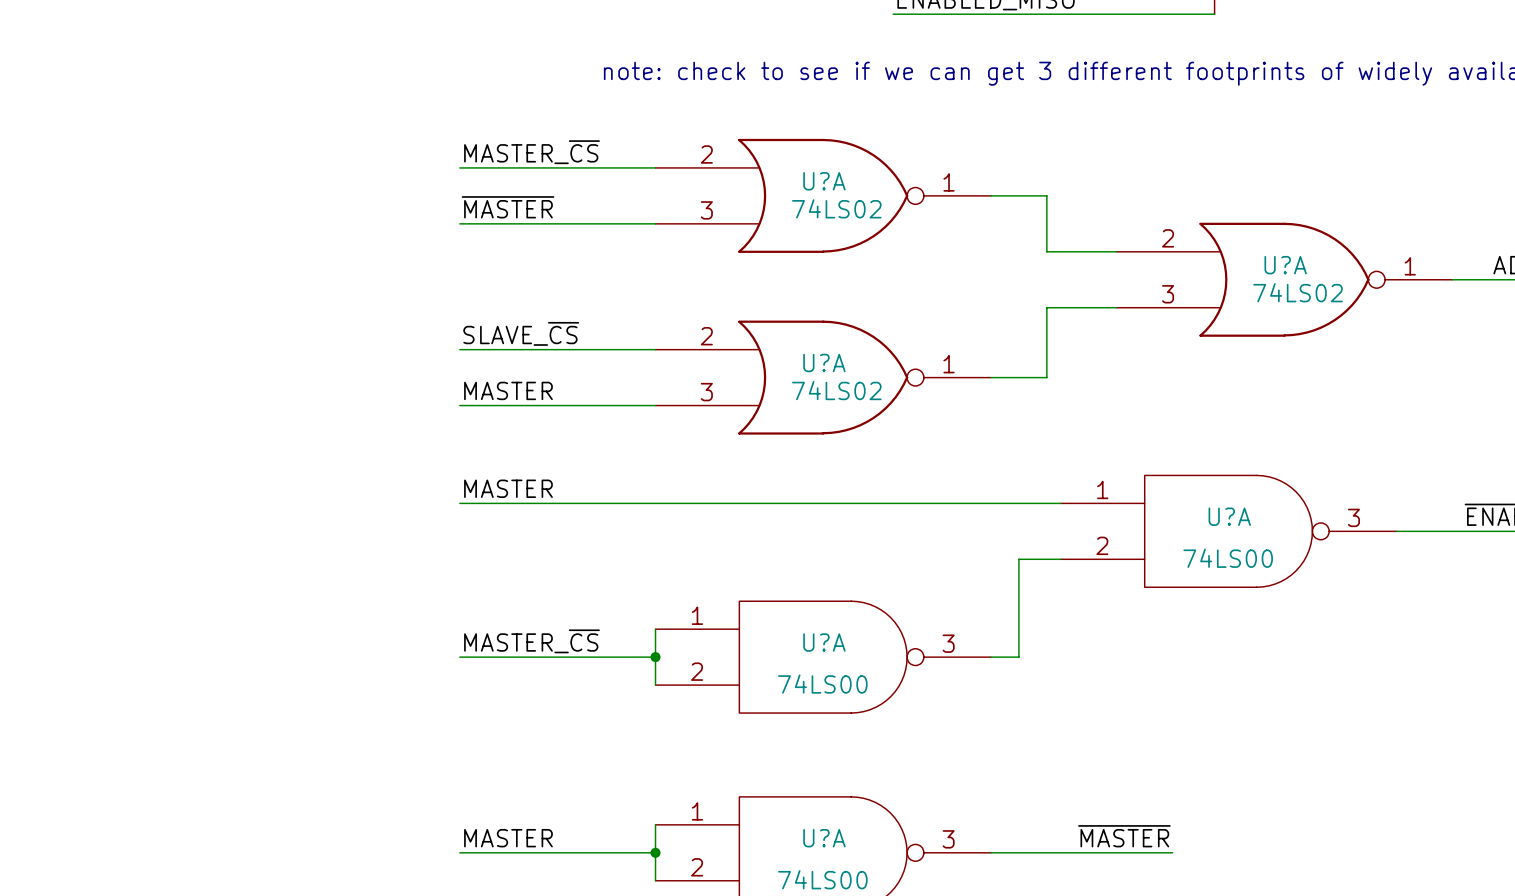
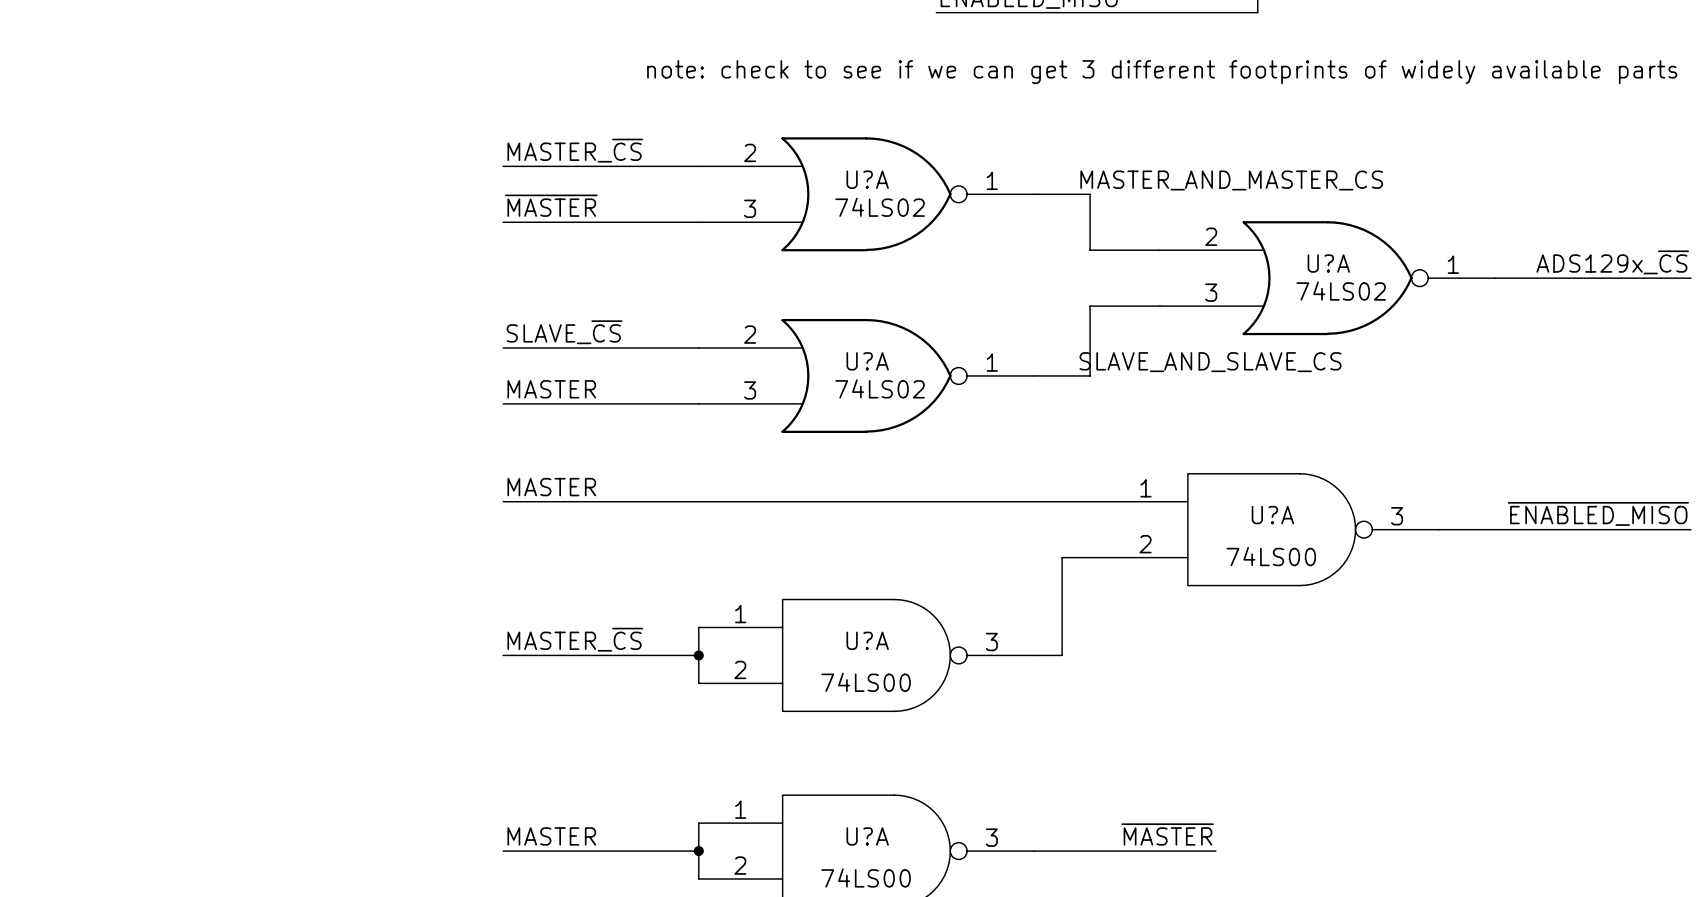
label: none -> MASTER_AND_MASTER_CS (1231, 180)
label: none -> SLAVE_AND_SLAVE_CS (1210, 362)

